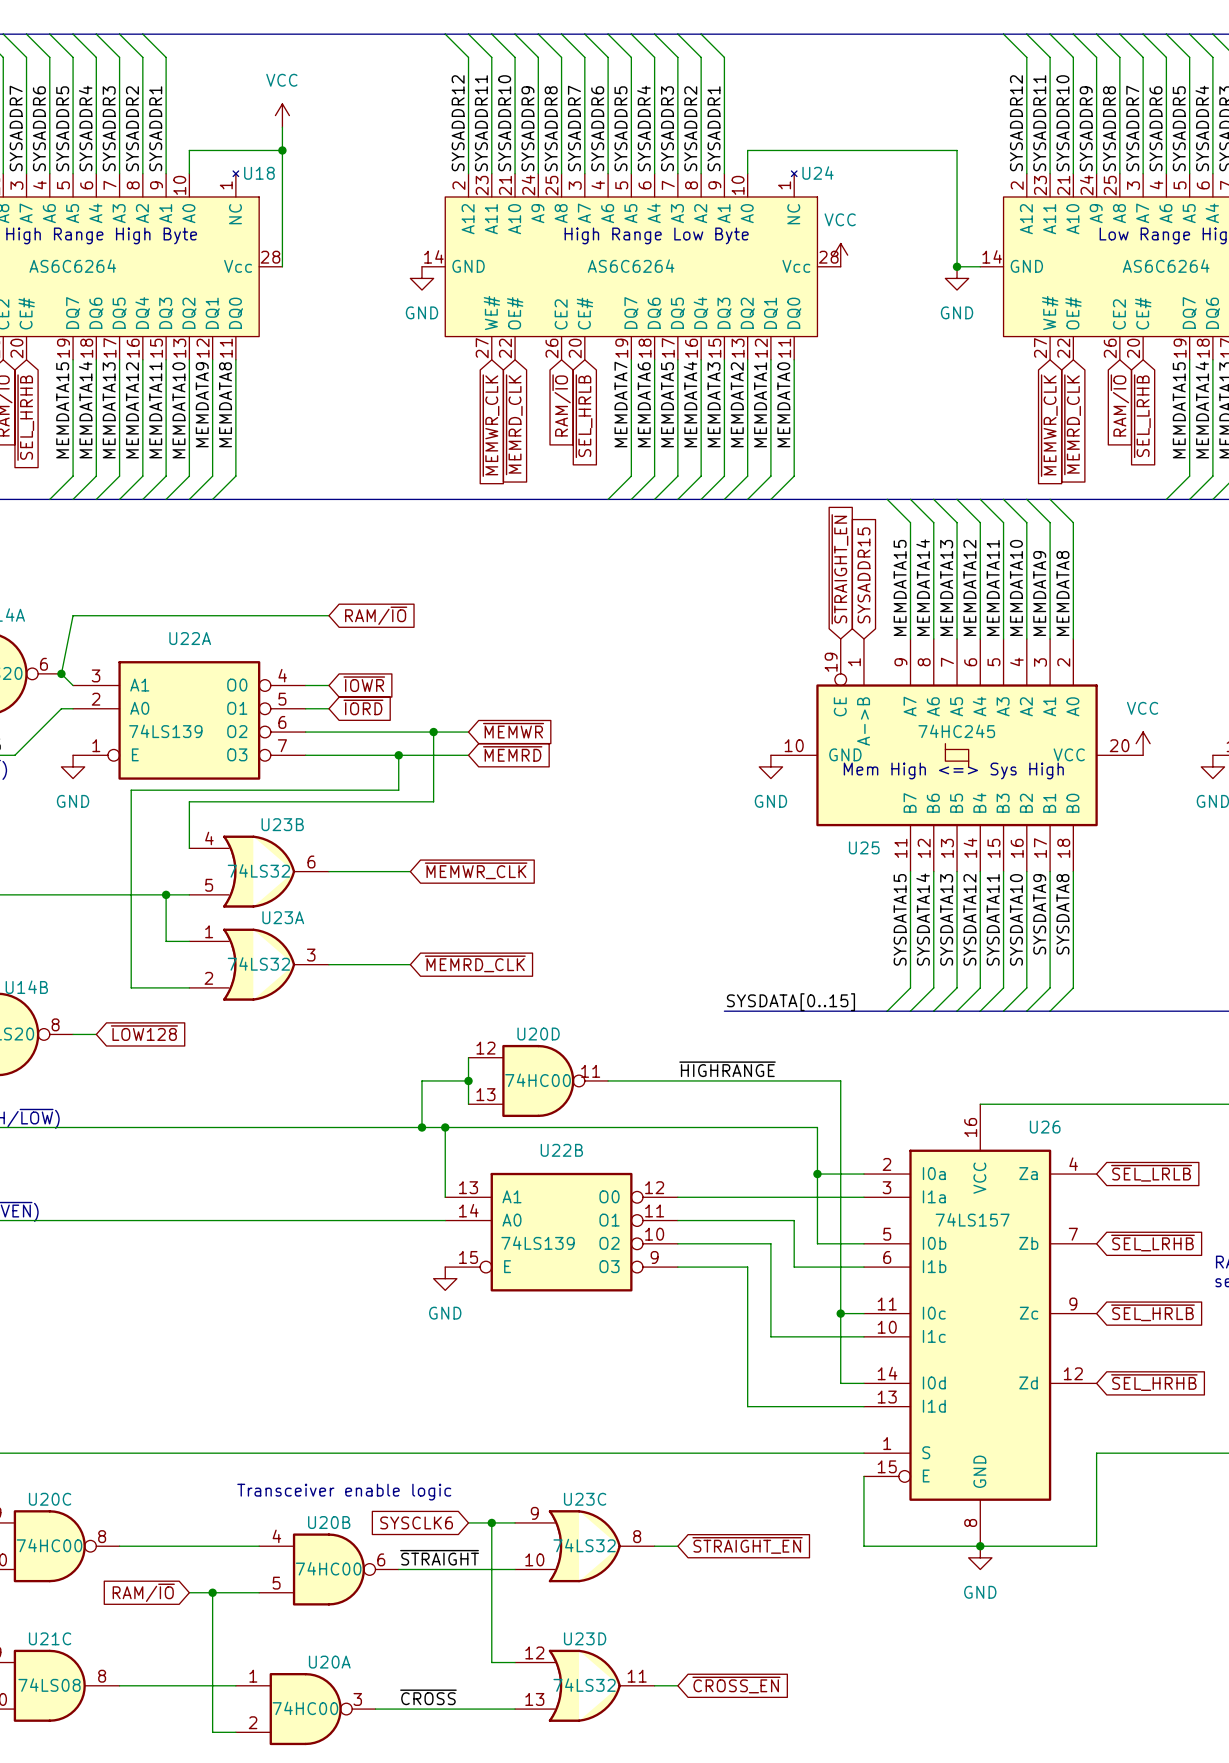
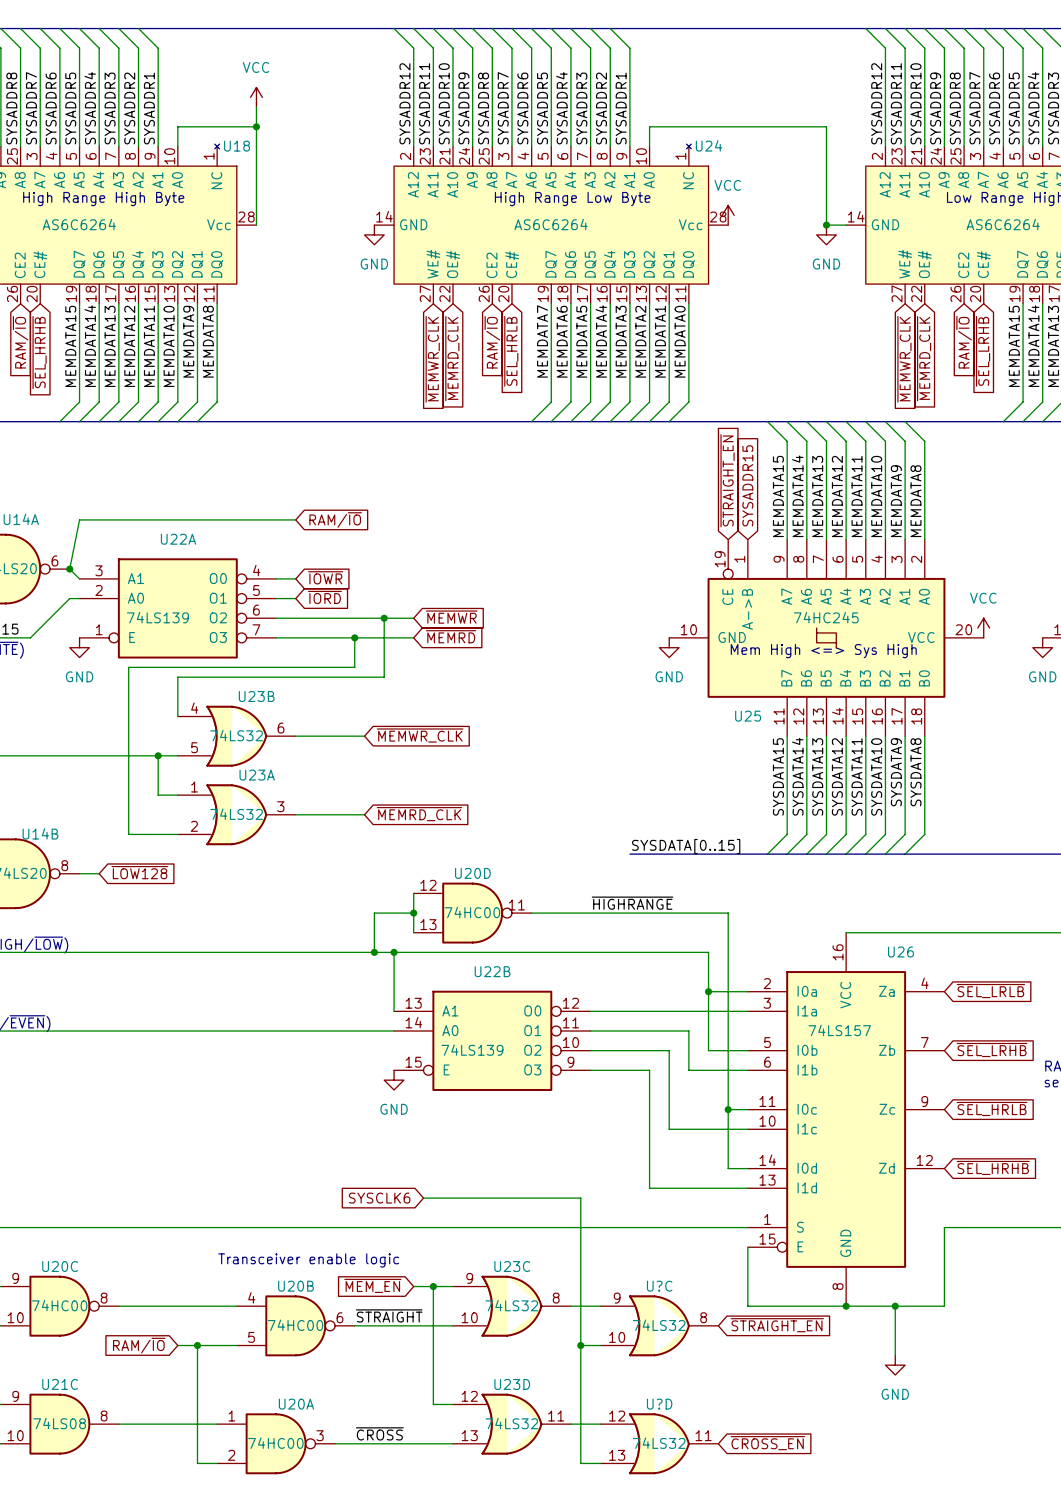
global label: none -> SYSCLK6 (379, 1198)
wire: none -> (423, 1198) (580, 1198) (580, 1463) (600, 1463)
global label: SYSCLK6 (416, 1522) -> ~{MEM_EN} (372, 1285)
global label position: ~{STRAIGHT_EN} (747, 1545) -> ~{STRAIGHT_EN} (777, 1325)
wire: none -> (590, 1306) (600, 1306)
wire: none -> (895, 1306) (895, 1355)
junction: none -> (895, 1306)
power symbol position: GND (980, 1557) -> GND (895, 1365)
U?C: none -> 74LS32 (659, 1325)
wire: none -> (580, 1345) (600, 1345)
junction: none -> (580, 1345)
wire: none -> (590, 1424) (600, 1424)
global label position: ~{CROSS_EN} (736, 1685) -> ~{CROSS_EN} (767, 1443)
U?D: none -> 74LS32 (659, 1443)

